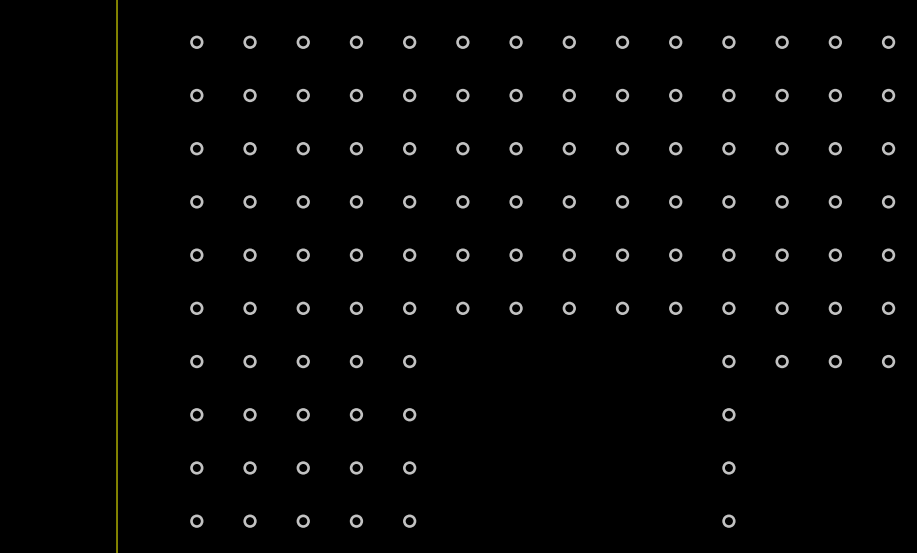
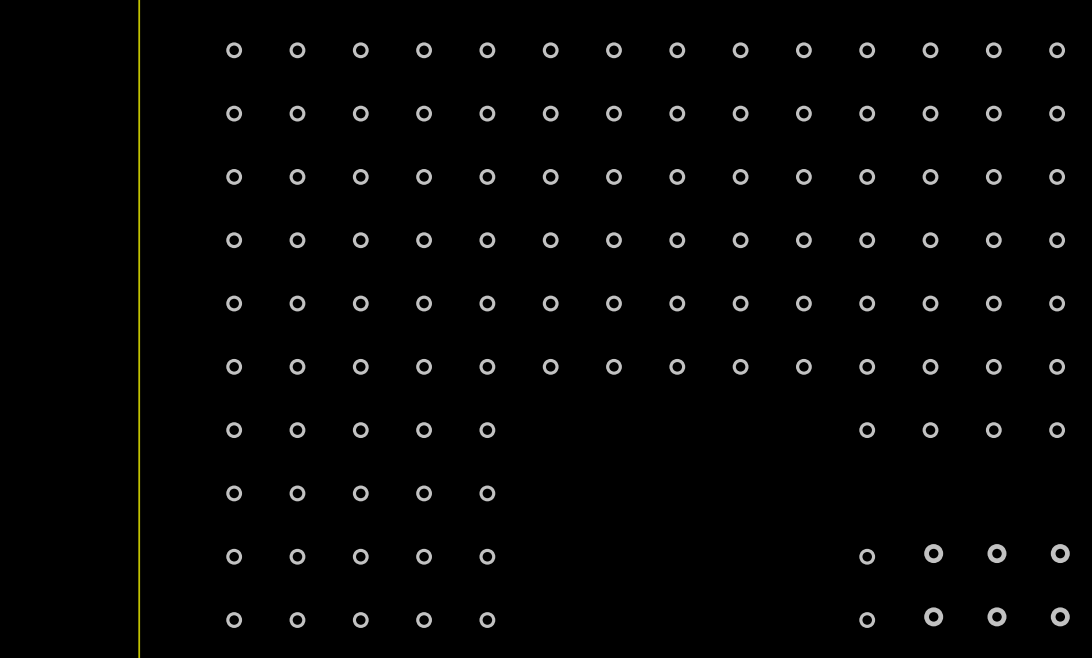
via: (728, 414) -> none
via: none -> (933, 553)
via: none -> (996, 553)
via: none -> (1060, 553)
via: none -> (933, 616)
via: none -> (996, 616)
via: none -> (1060, 616)

